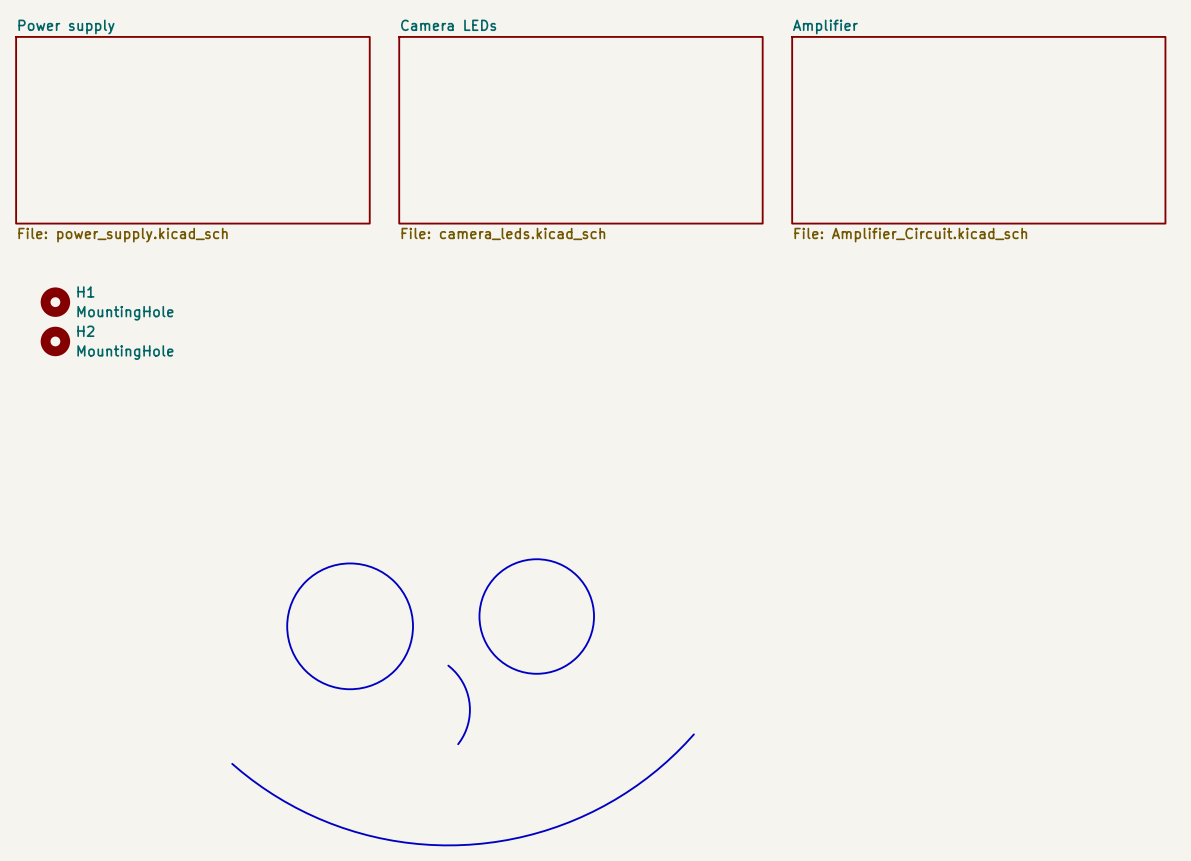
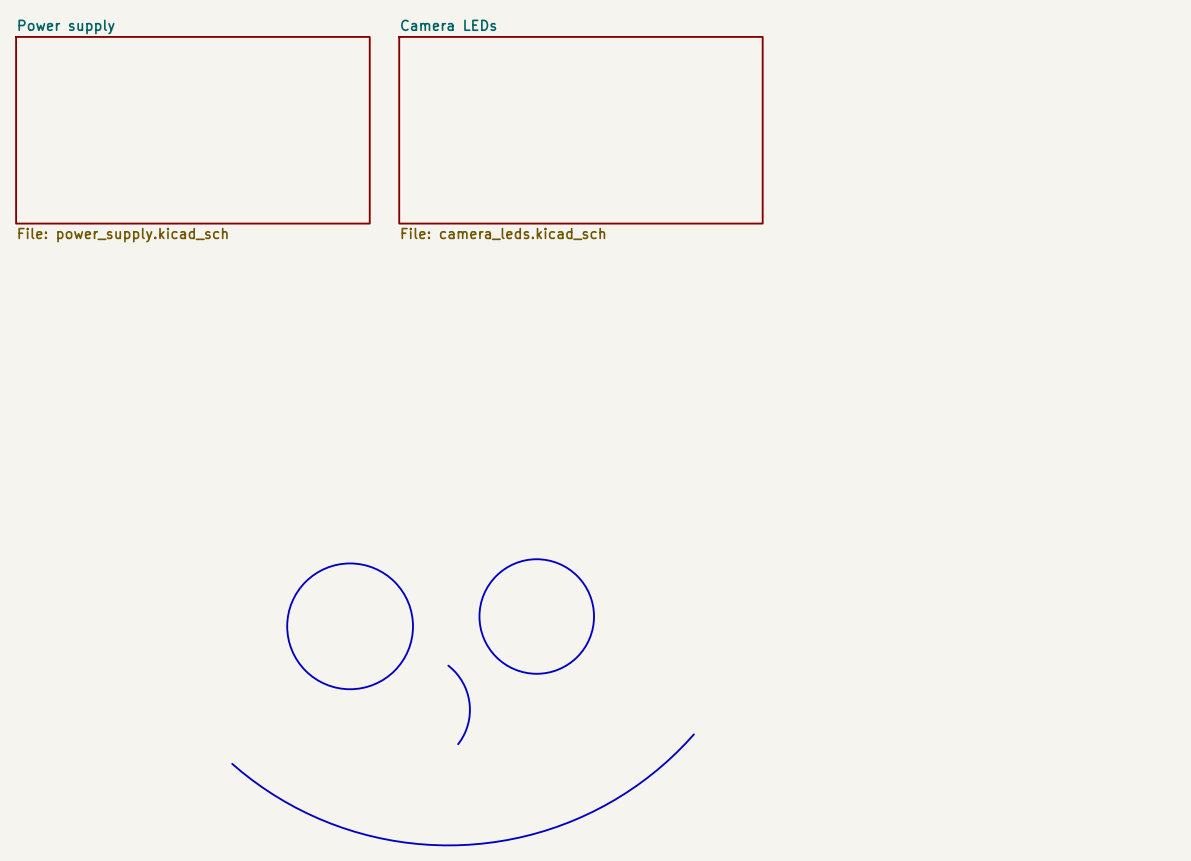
sheet Amplifier: File: Amplifier_Circuit.kicad_sch (978, 130) -> none
H1: MountingHole (55, 302) -> none
H2: MountingHole (55, 341) -> none

